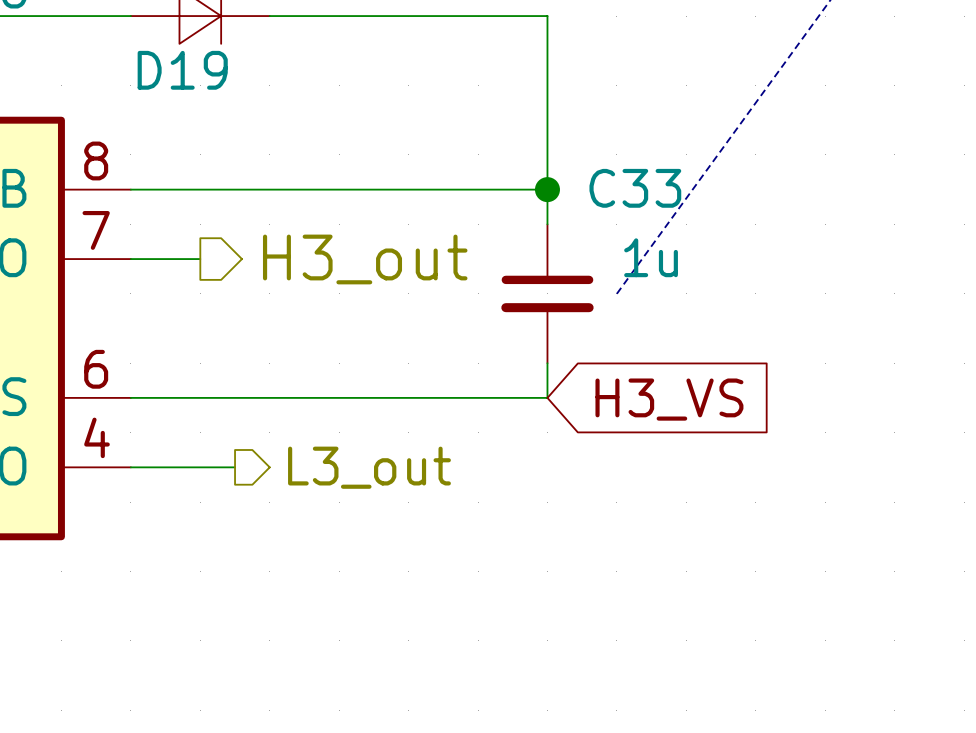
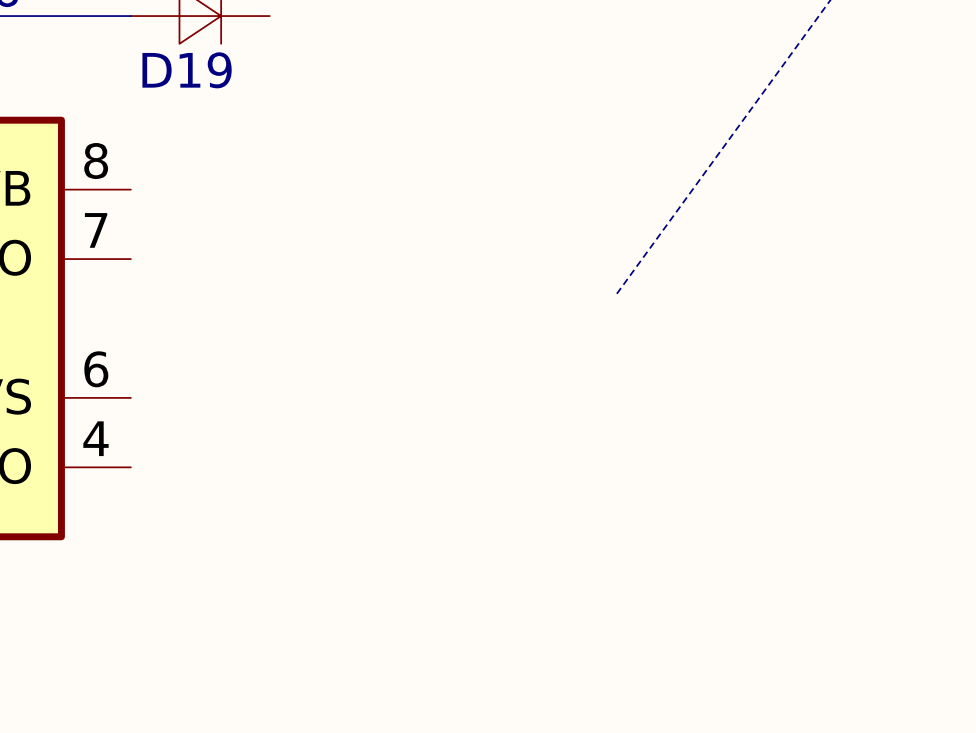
wire: (269, 16) (547, 16) (547, 224) -> none
wire: (130, 189) (547, 189) -> none
junction: (547, 189) -> none
wire: (130, 259) (200, 259) -> none
hierarchical label: H3_out (365, 259) -> none
C33: 1u (547, 293) -> none
wire: (547, 363) (547, 397) (130, 397) -> none
global label: H3_VS (669, 399) -> none
wire: (130, 467) (235, 467) -> none
hierarchical label: L3_out (369, 467) -> none

